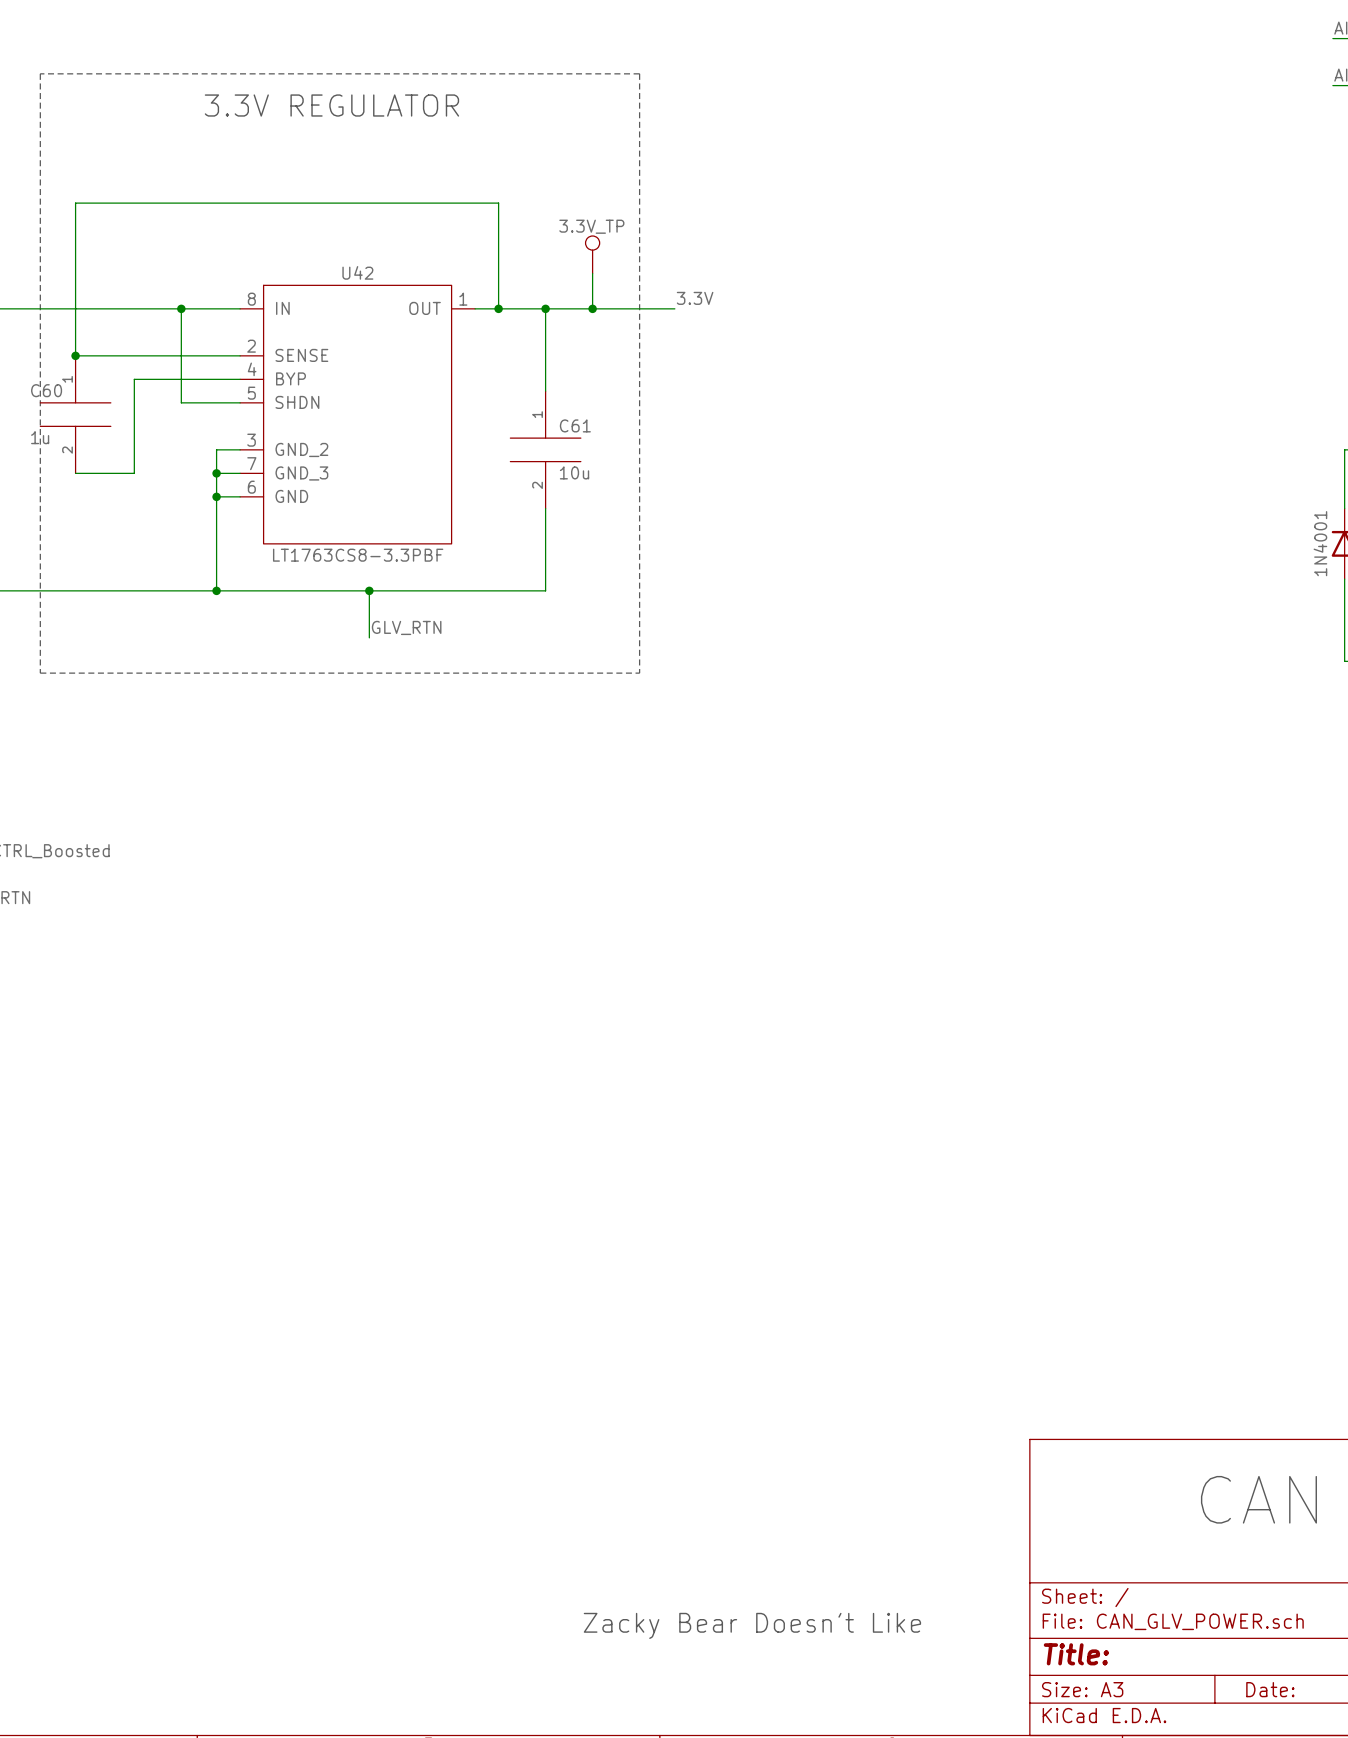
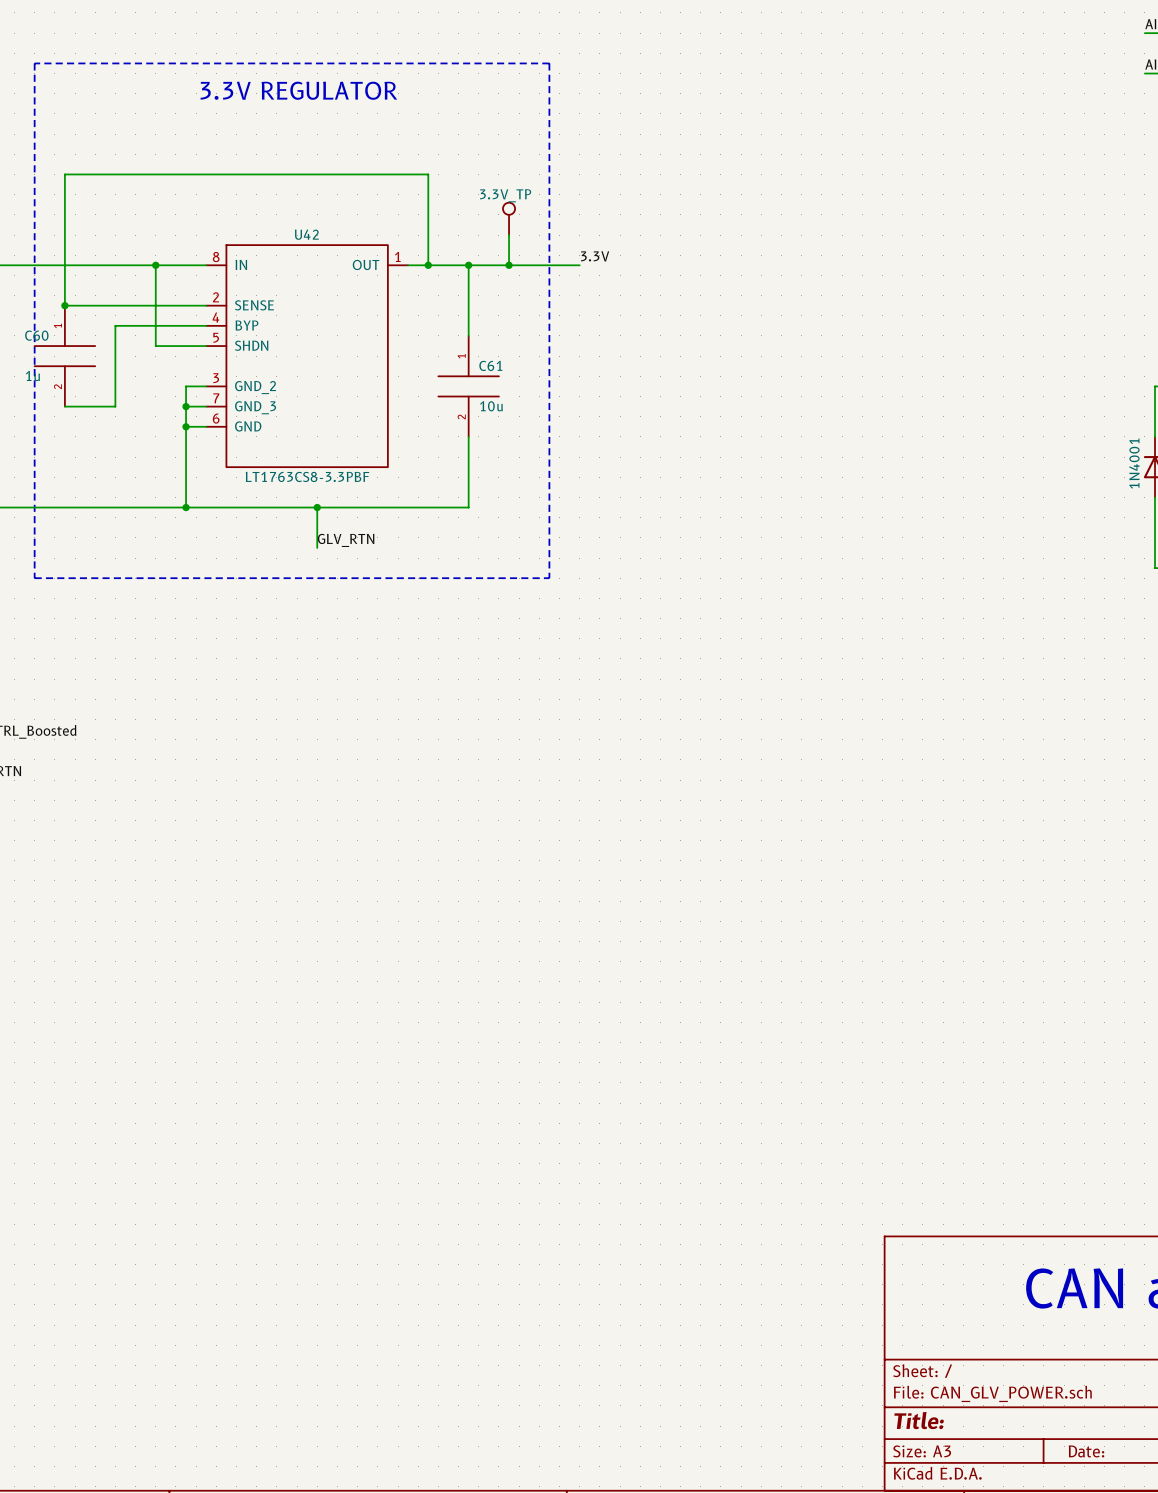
text: Zacky Bear Doesn't Like (752, 1625) -> none

